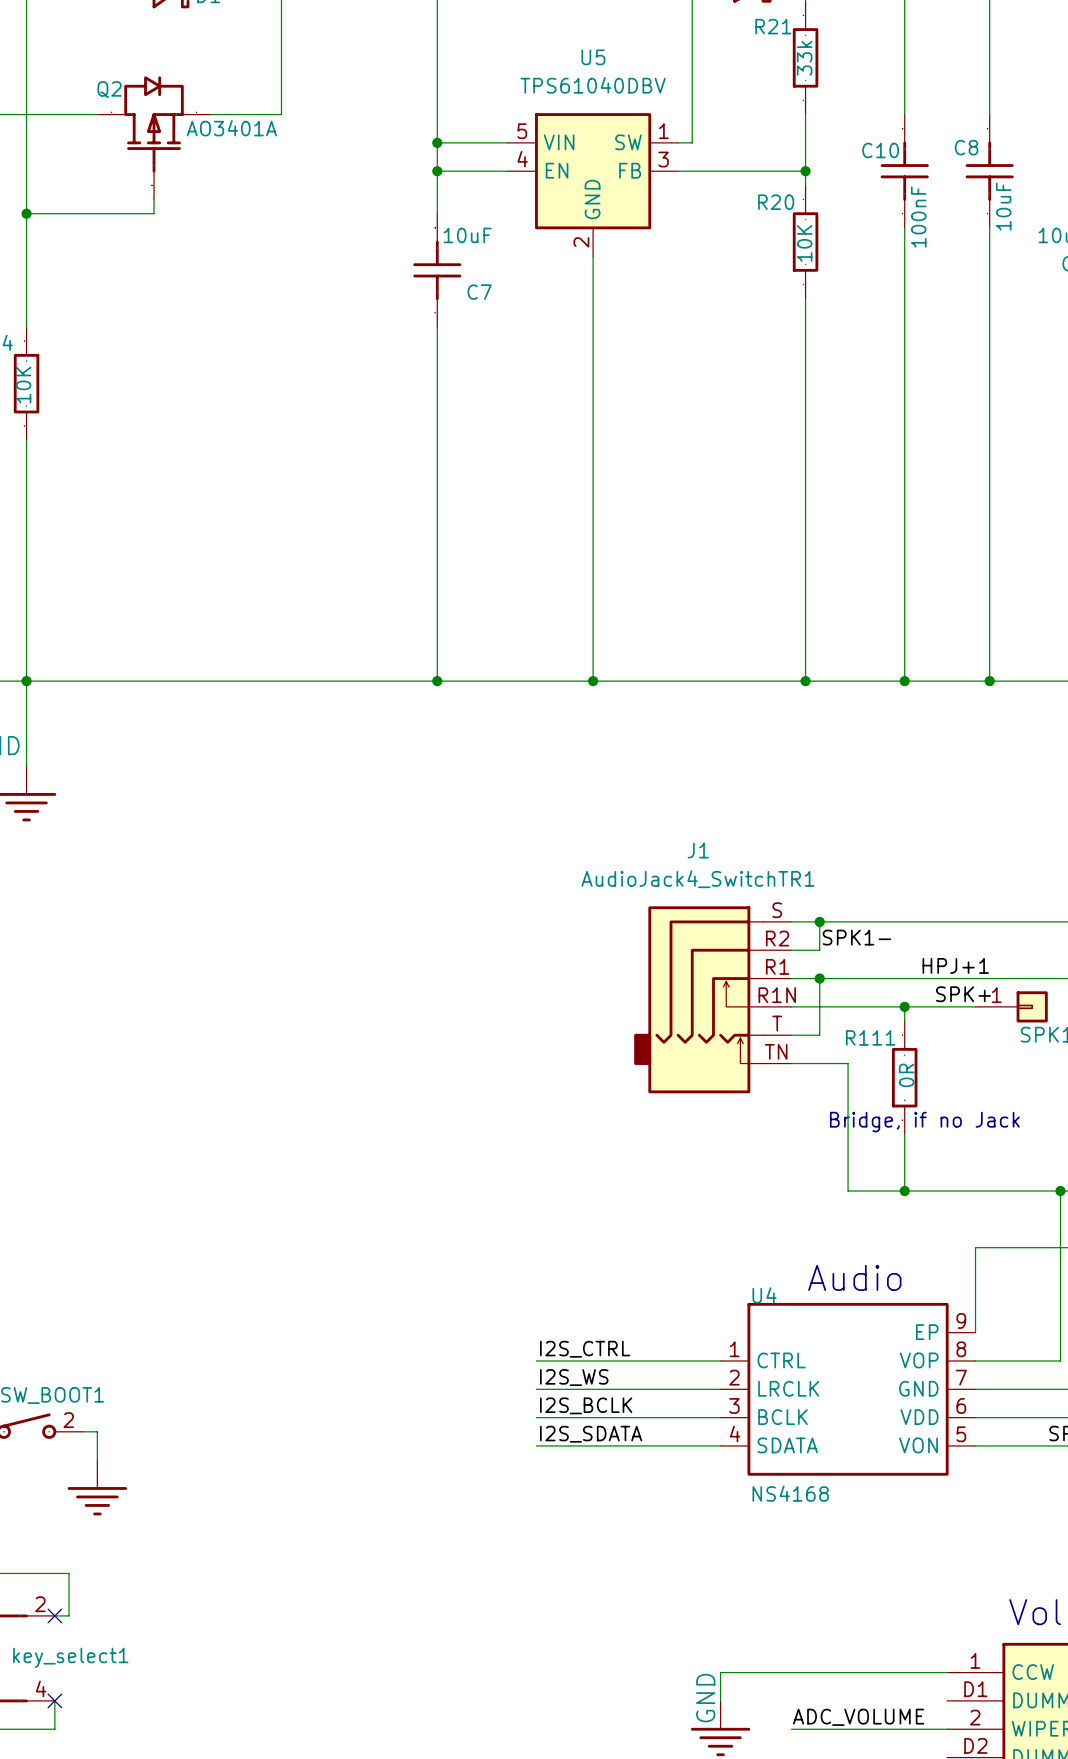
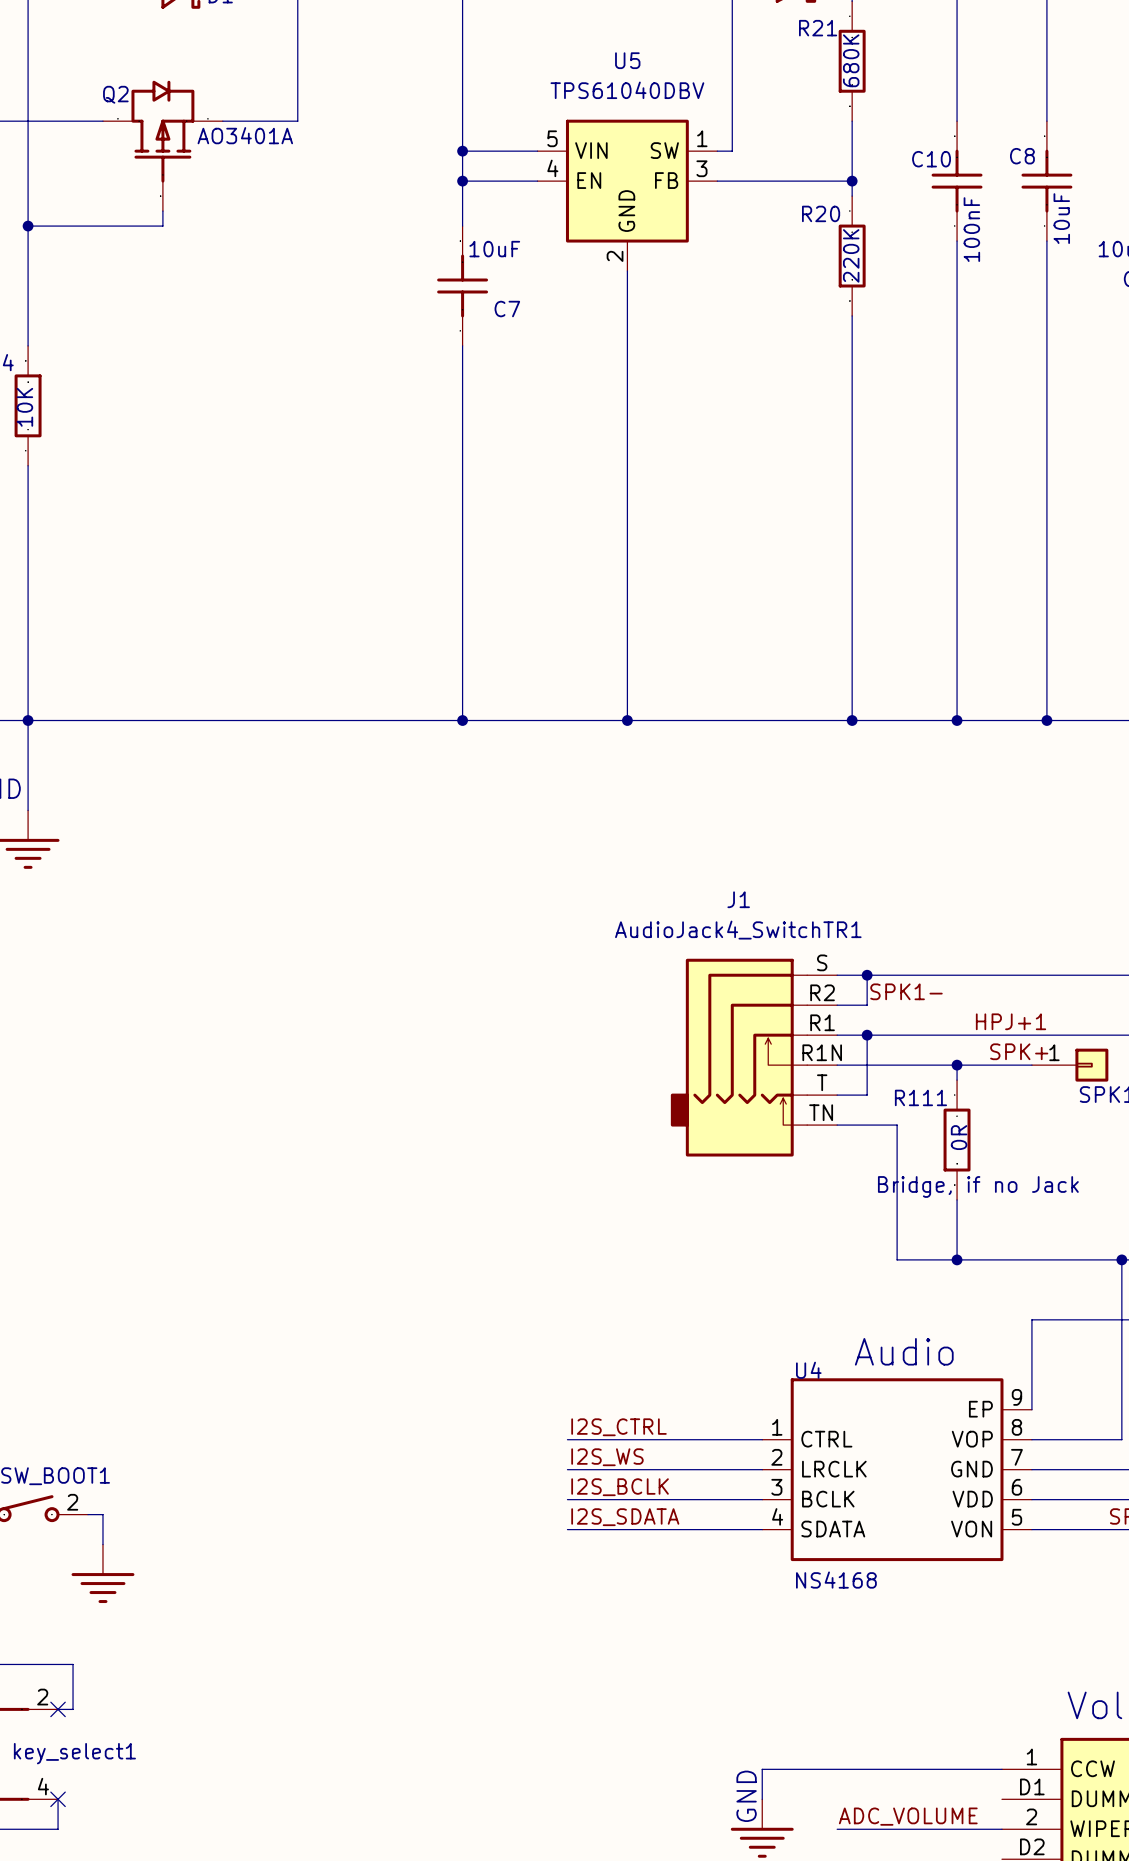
R21 value: 33k (804, 58) -> 680K (851, 60)
R20 value: 10K (804, 243) -> 220K (851, 255)

